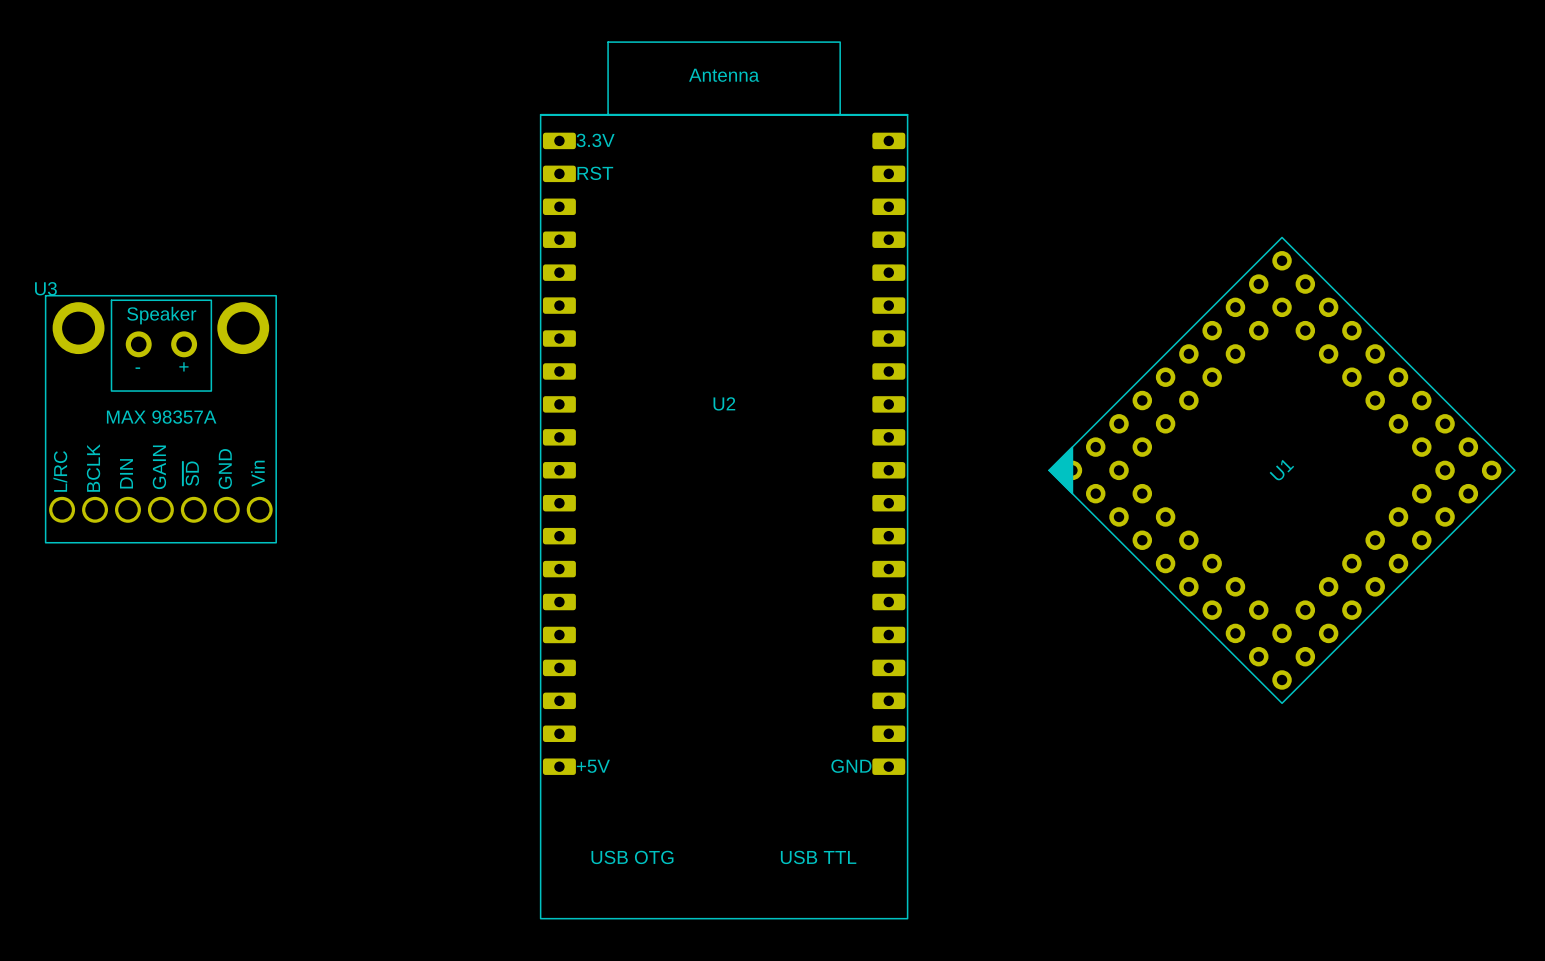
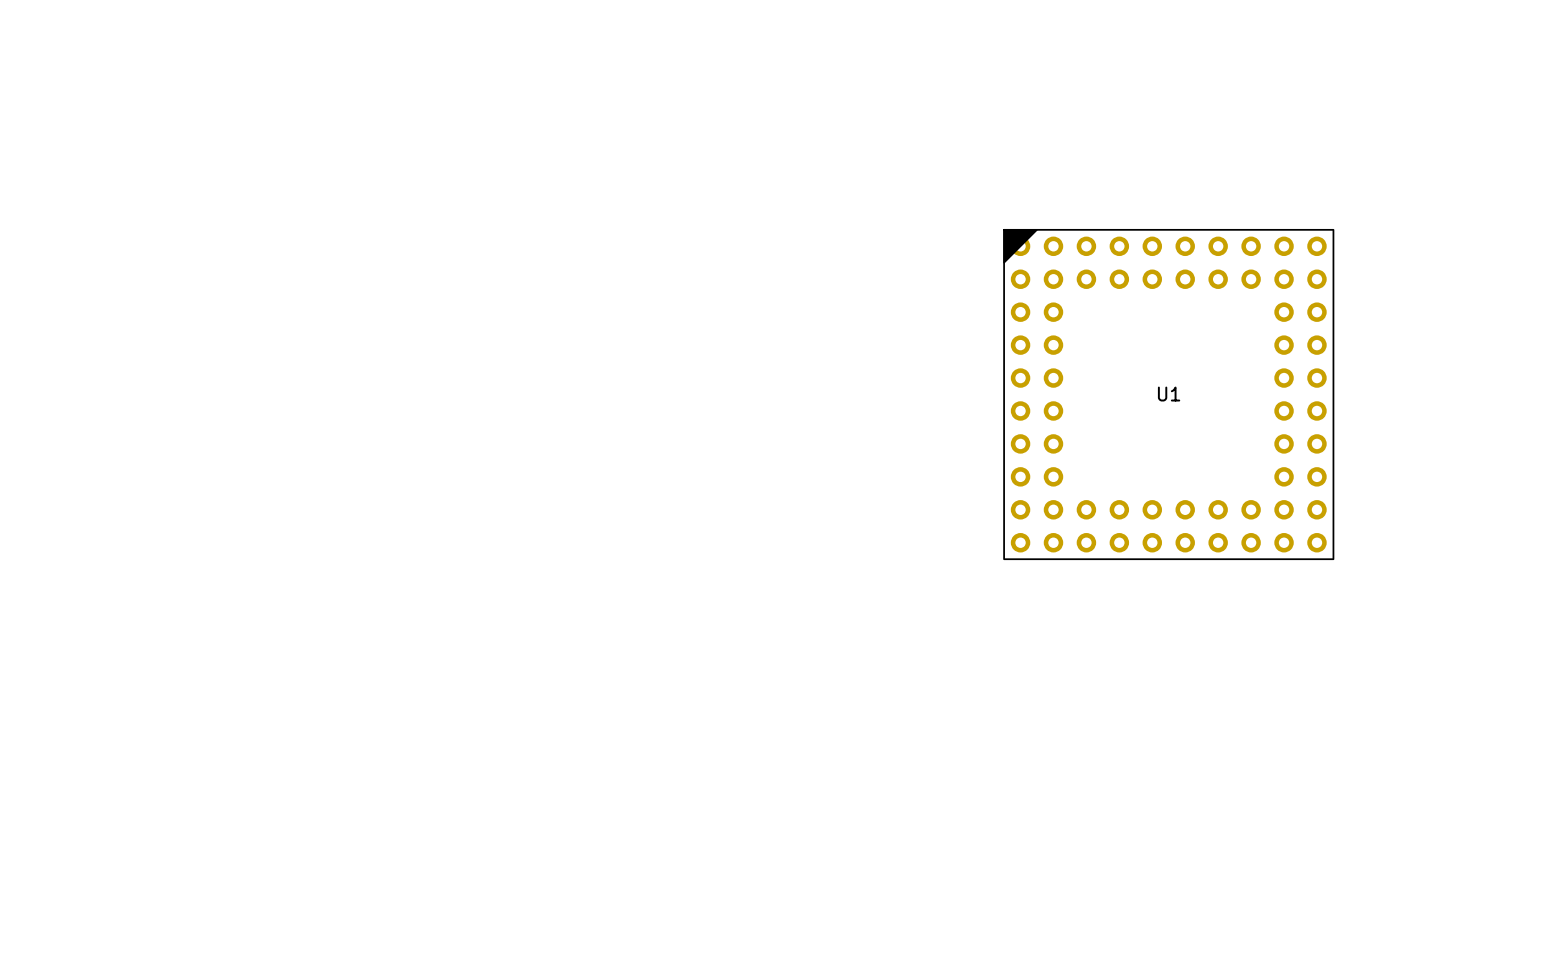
U3: (160, 419) -> none
U1 rotation: 0° (1282, 470) -> 45° clockwise (1168, 394)
U2: (724, 480) -> none

